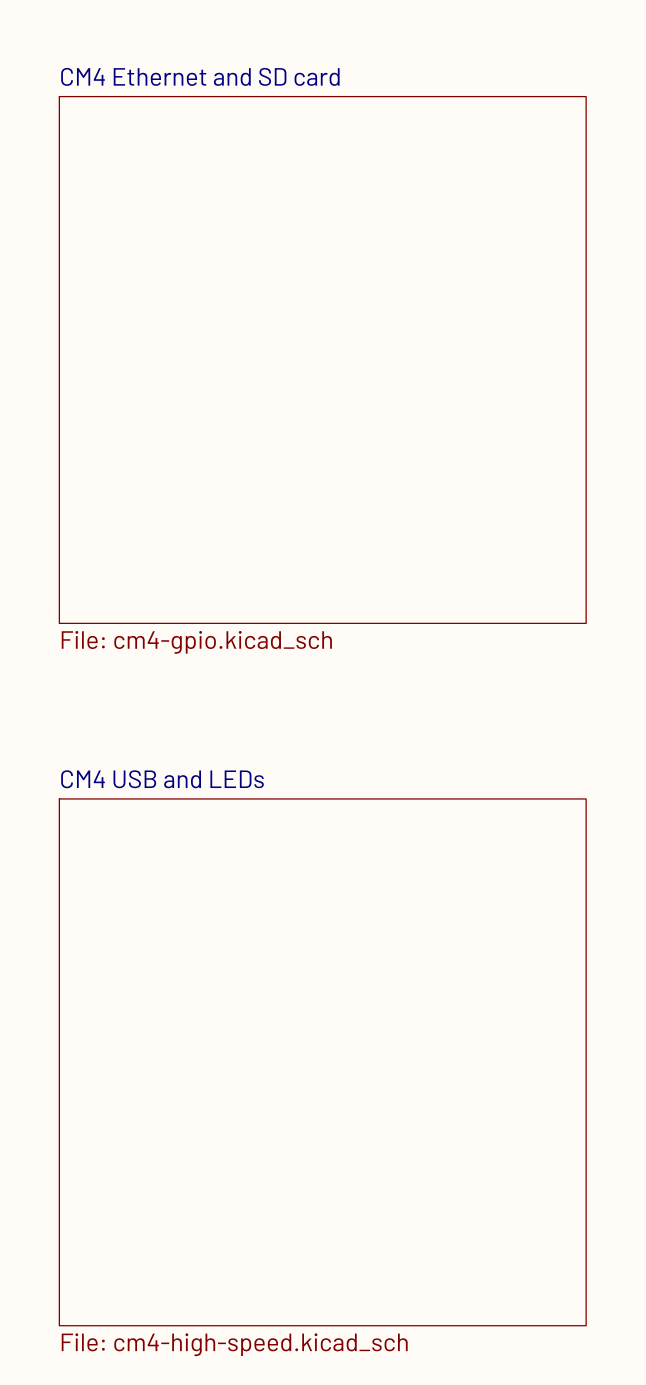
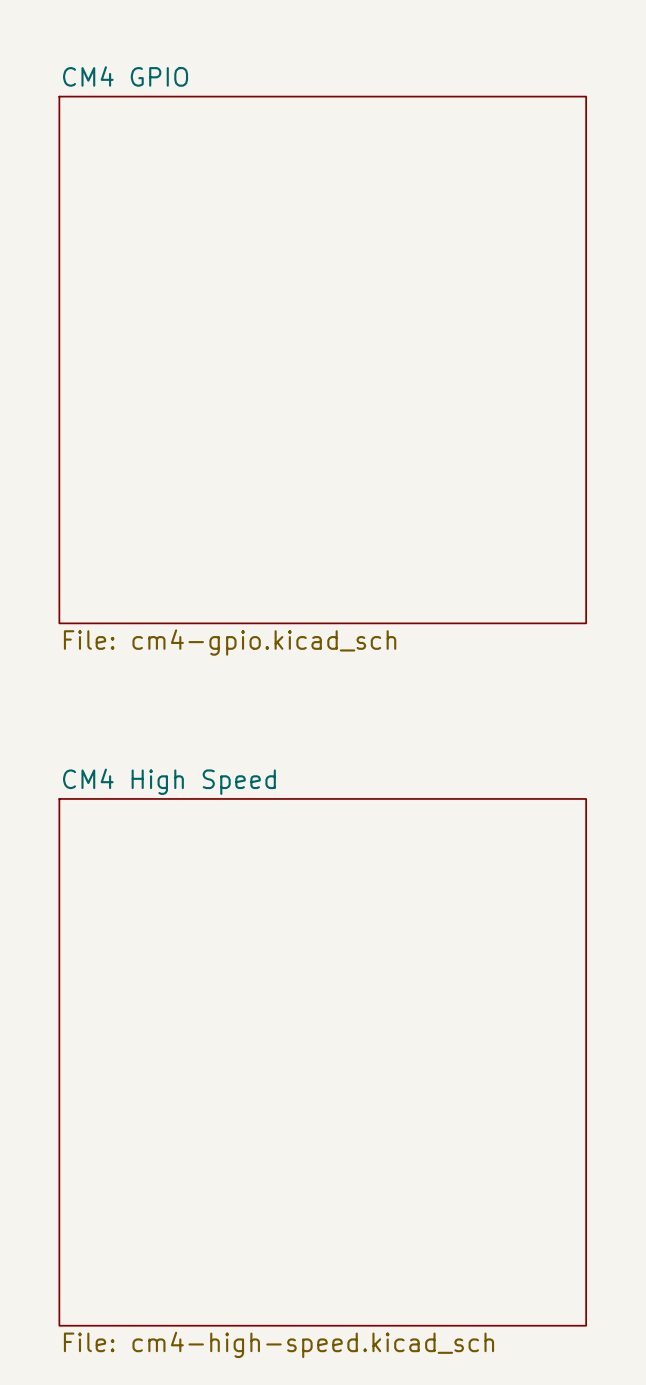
sheet CM4 Ethernet and SD card name: CM4 Ethernet and SD card (200, 76) -> CM4 GPIO (125, 76)
sheet CM4 USB and LEDs name: CM4 USB and LEDs (162, 779) -> CM4 High Speed (169, 781)

